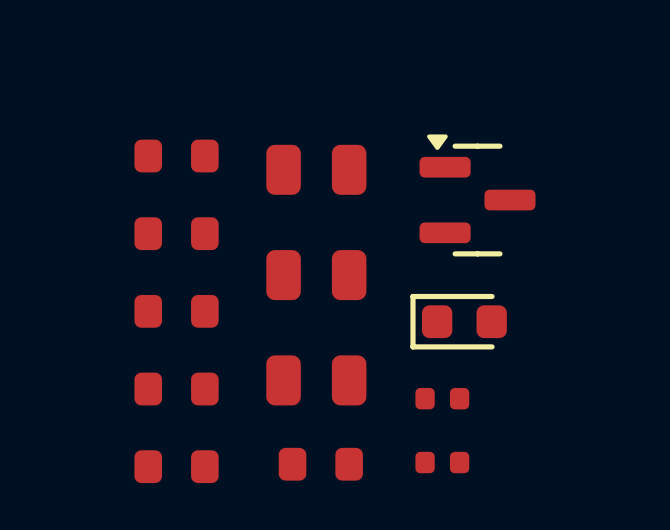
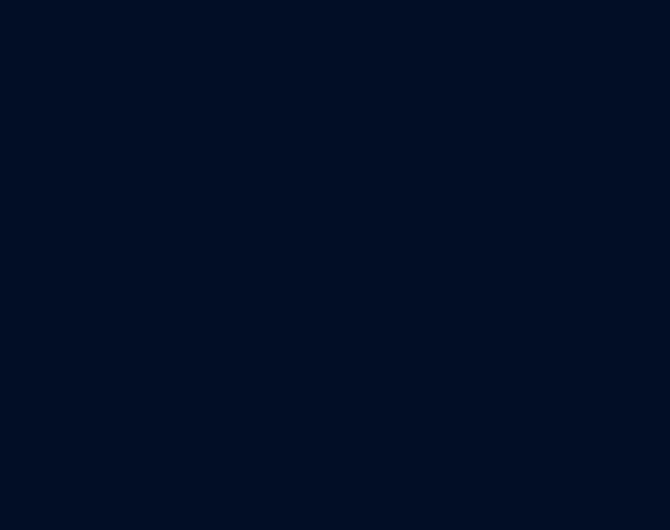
part: (176, 156) -> none
part: (316, 169) -> none
part: (477, 195) -> none
part: (176, 233) -> none
part: (316, 275) -> none
part: (176, 311) -> none
part: (458, 321) -> none
part: (316, 380) -> none
part: (176, 389) -> none
part: (442, 398) -> none
part: (442, 462) -> none
part: (320, 464) -> none
part: (176, 466) -> none

